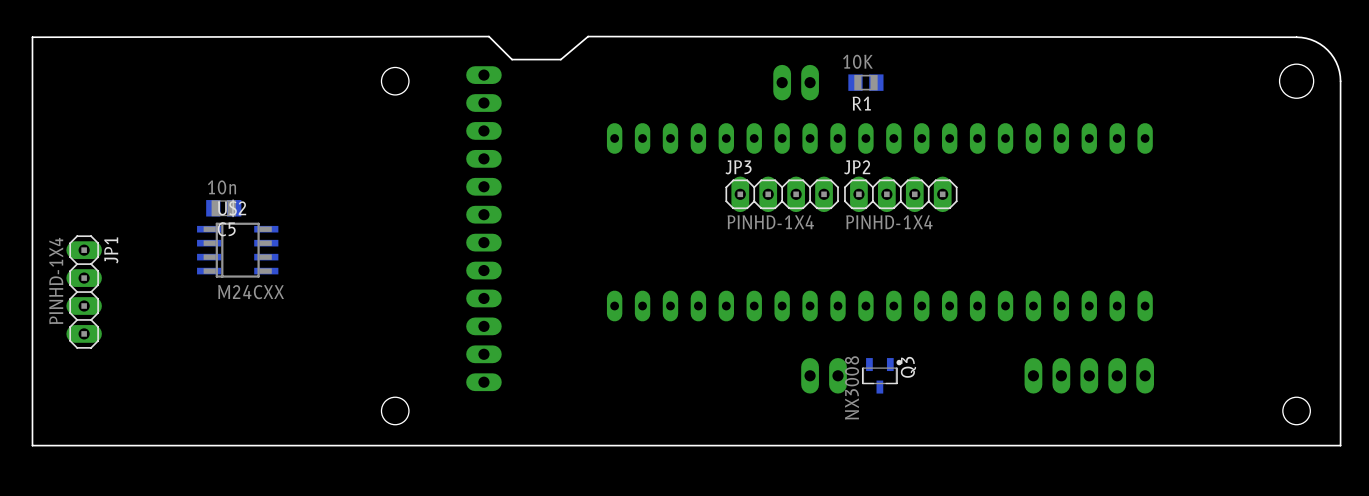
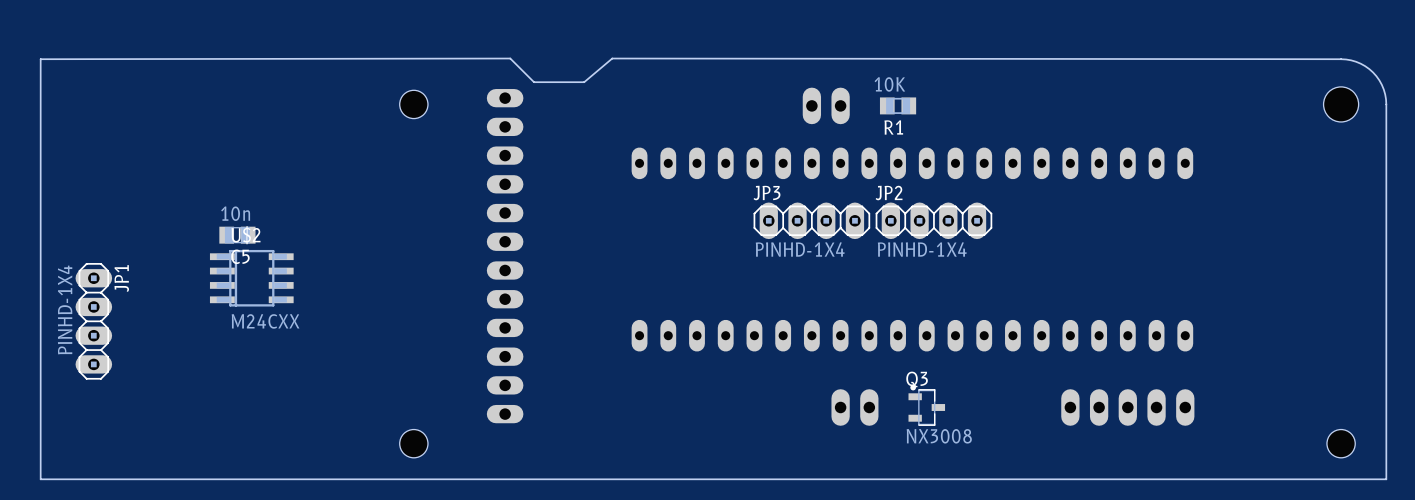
Q3 rotation: 0° (881, 375) -> 90° counterclockwise (926, 405)

